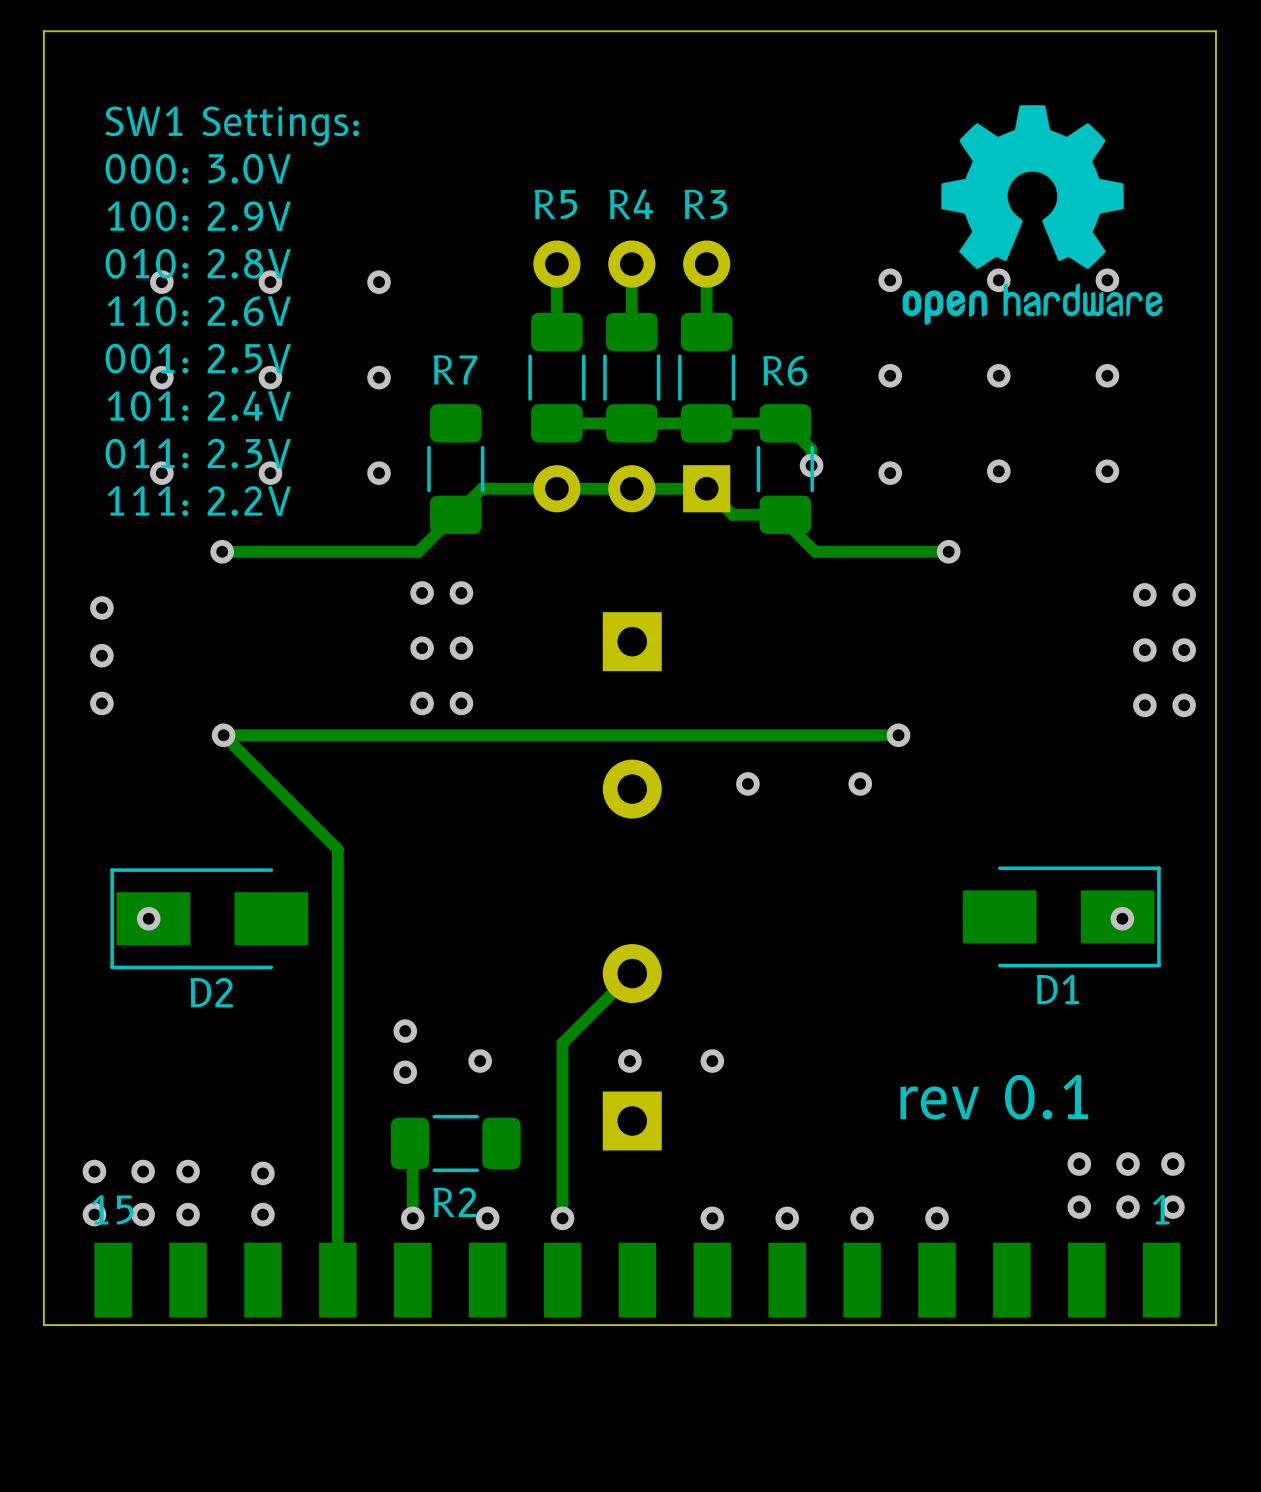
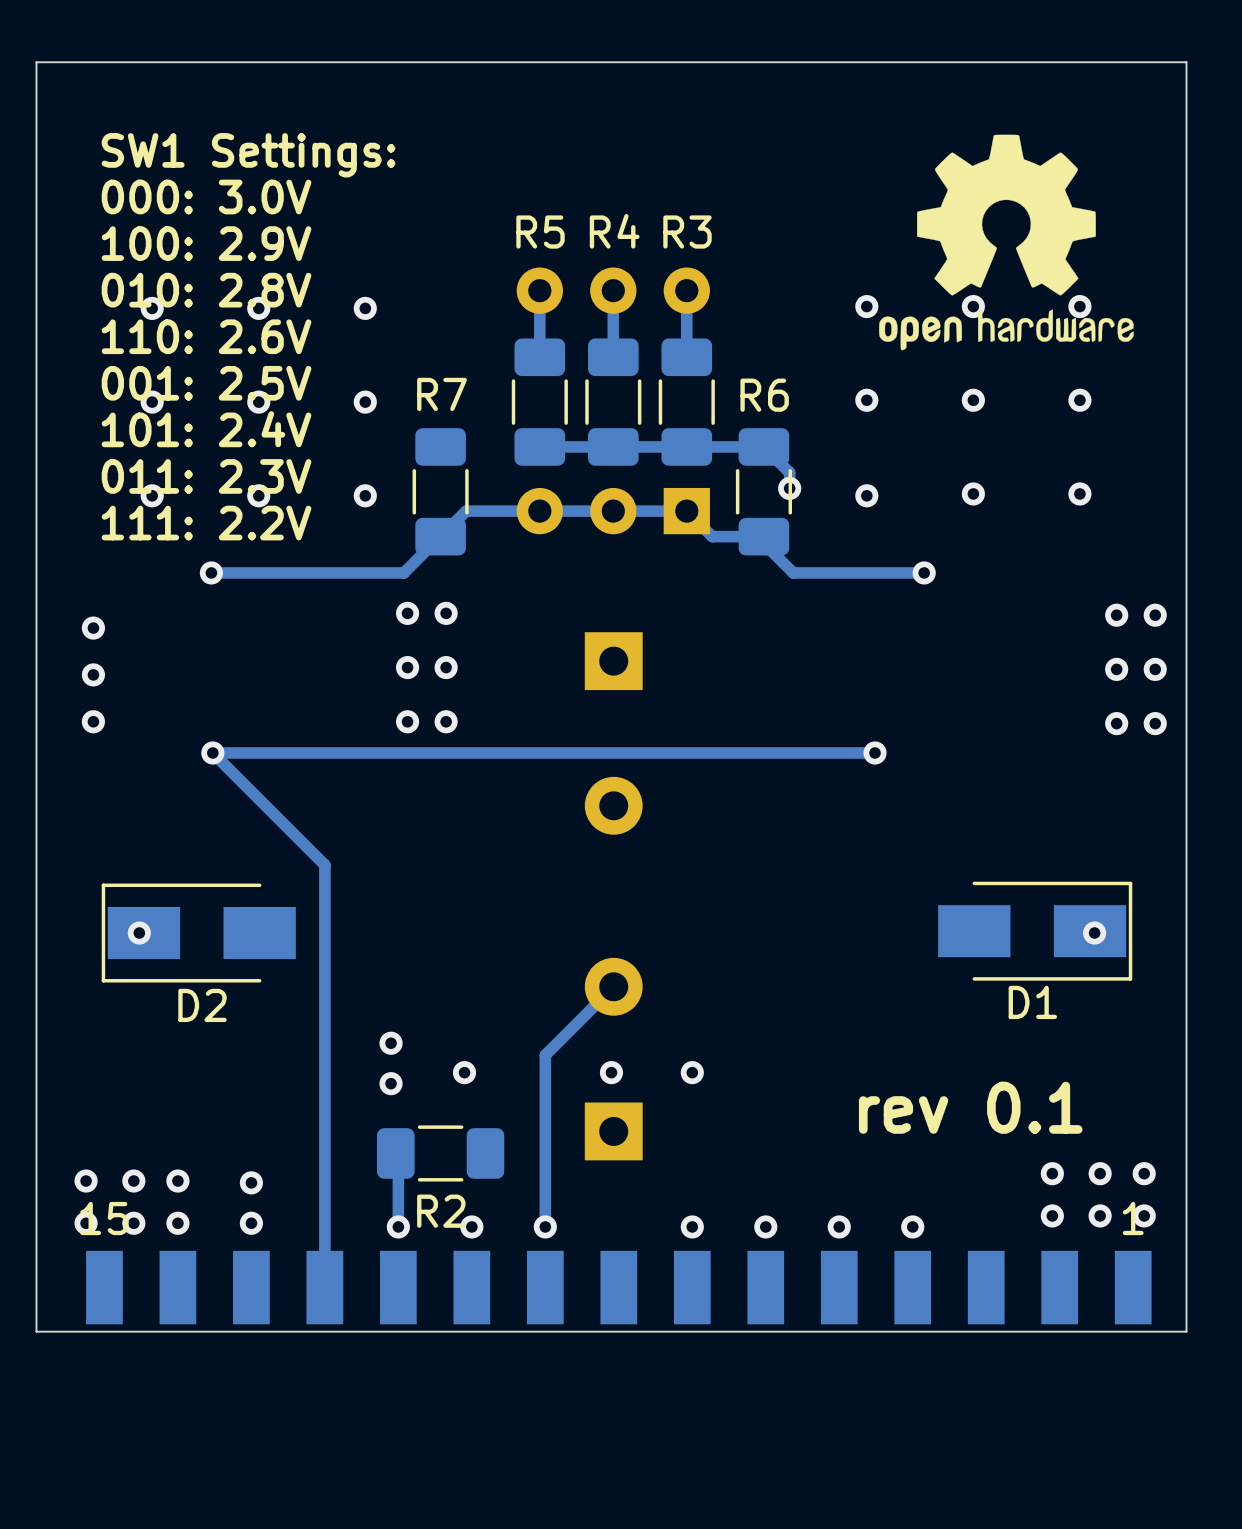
via: (747, 783) -> none
via: (860, 783) -> none

